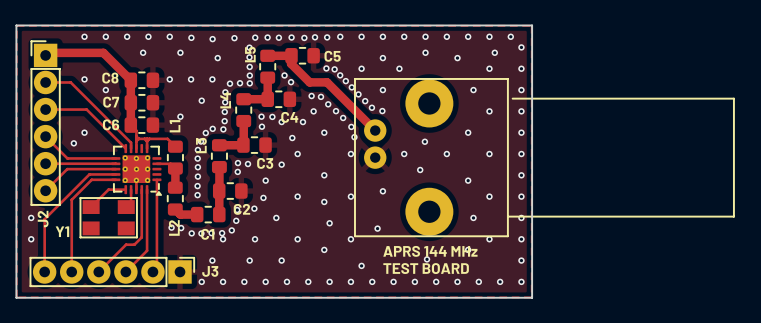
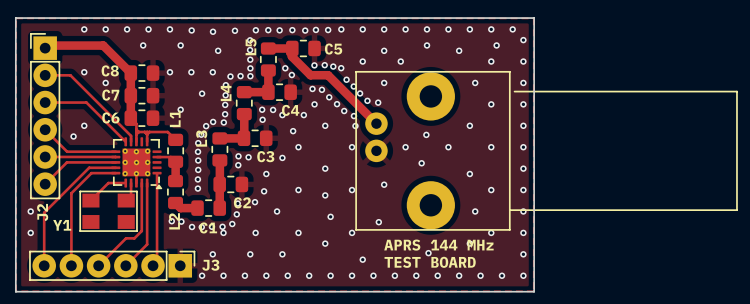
via: (326, 68) -> none
via: (334, 69) -> none
via: none -> (314, 65)
via: none -> (324, 65)
via: none -> (333, 66)
via: (345, 81) -> none
via: none -> (346, 79)
via: (351, 87) -> none
via: none -> (353, 86)
via: (358, 94) -> none
via: none -> (360, 93)
via: (365, 101) -> none
via: none -> (367, 100)
via: (371, 107) -> none
via: none -> (378, 102)
via: (382, 111) -> none
via: none -> (353, 116)
via: (351, 126) -> none
via: none -> (355, 126)
via: (354, 137) -> none

